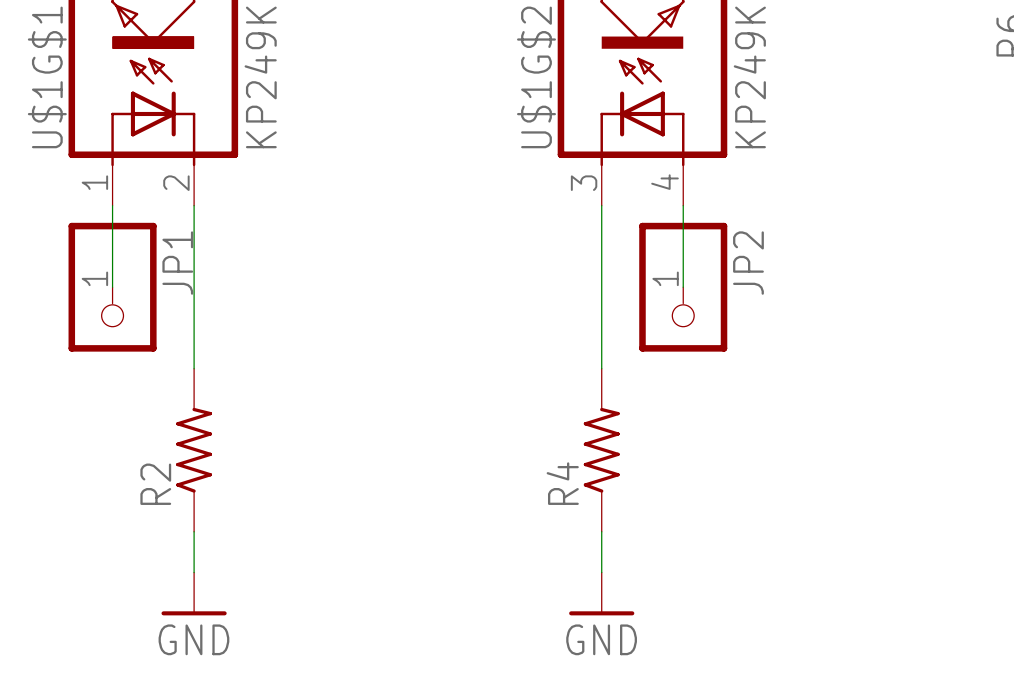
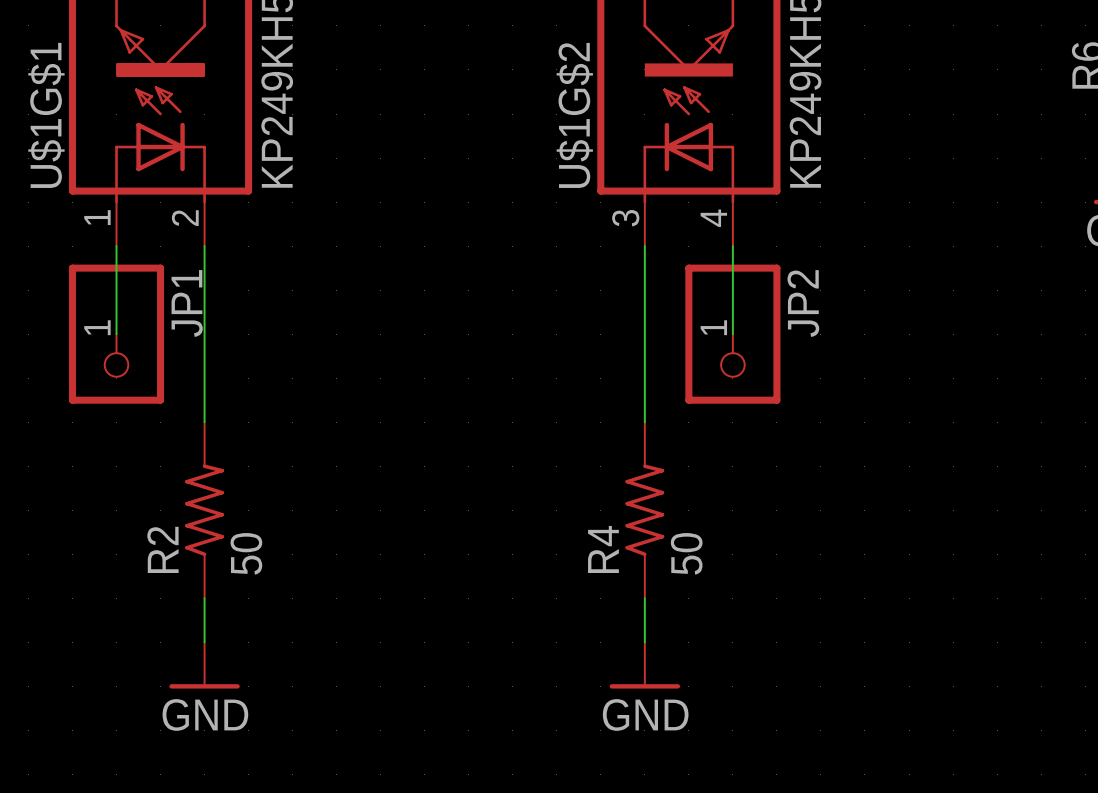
R2 value: none -> 50 (246, 553)
R4 value: none -> 50 (686, 553)

